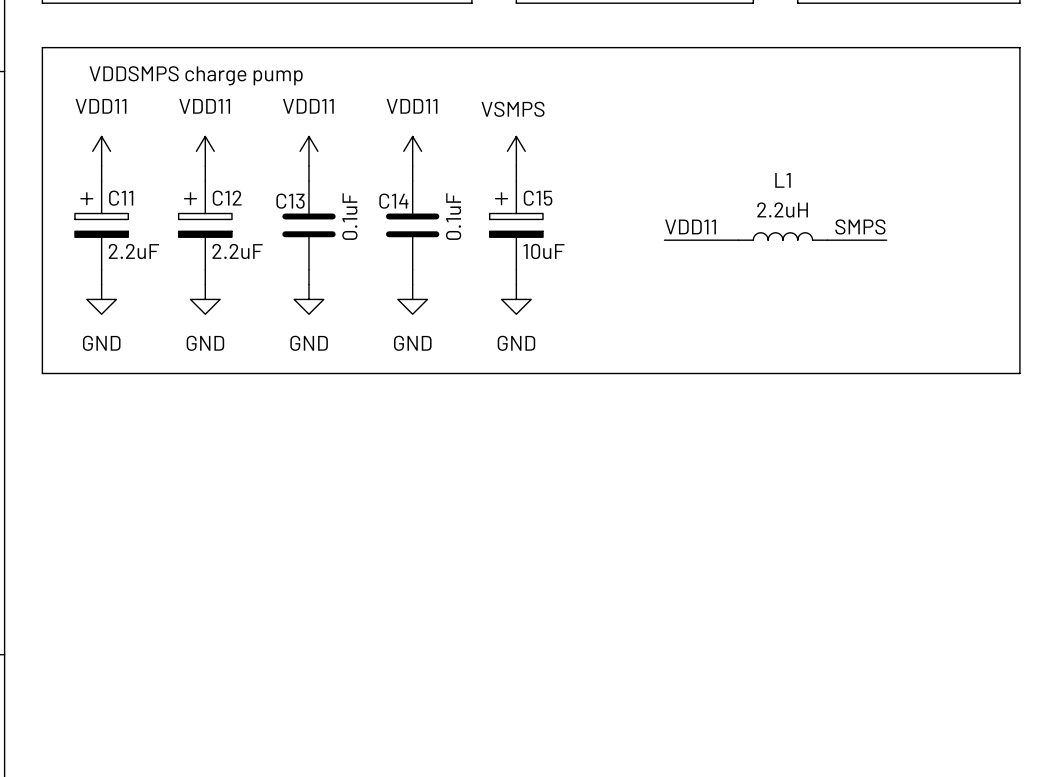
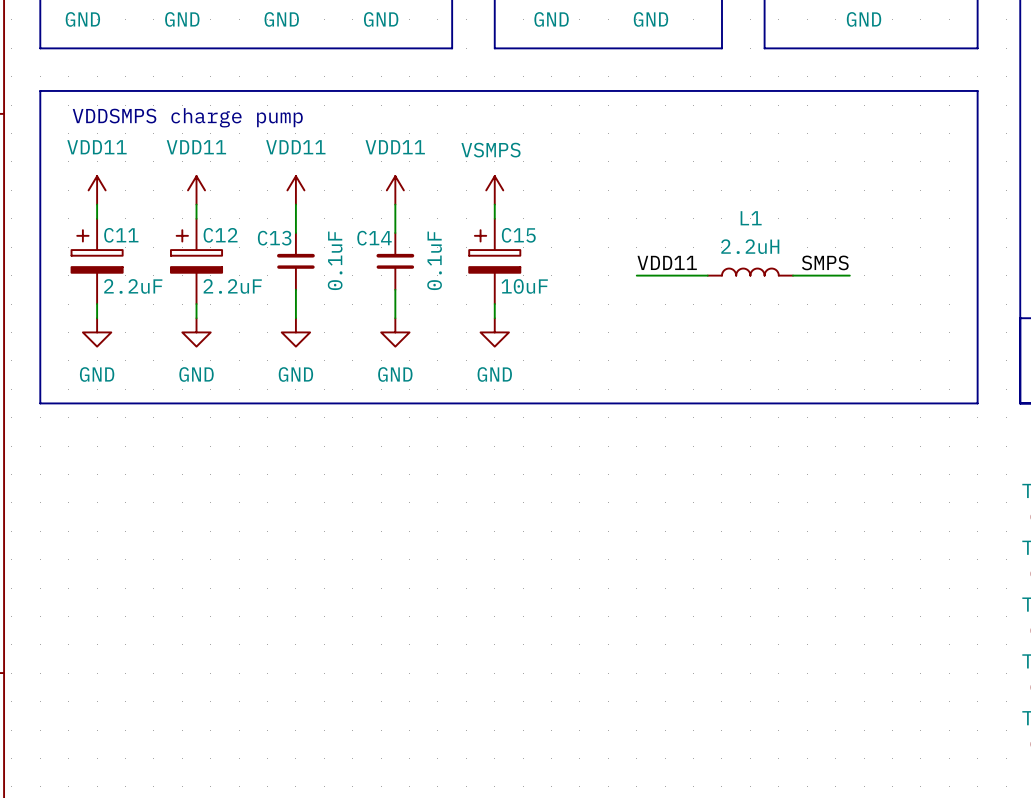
C13 symbol: [282, 180, 336, 270] -> [277, 233, 315, 290]
C14 symbol: [386, 180, 440, 270] -> [376, 233, 415, 290]

